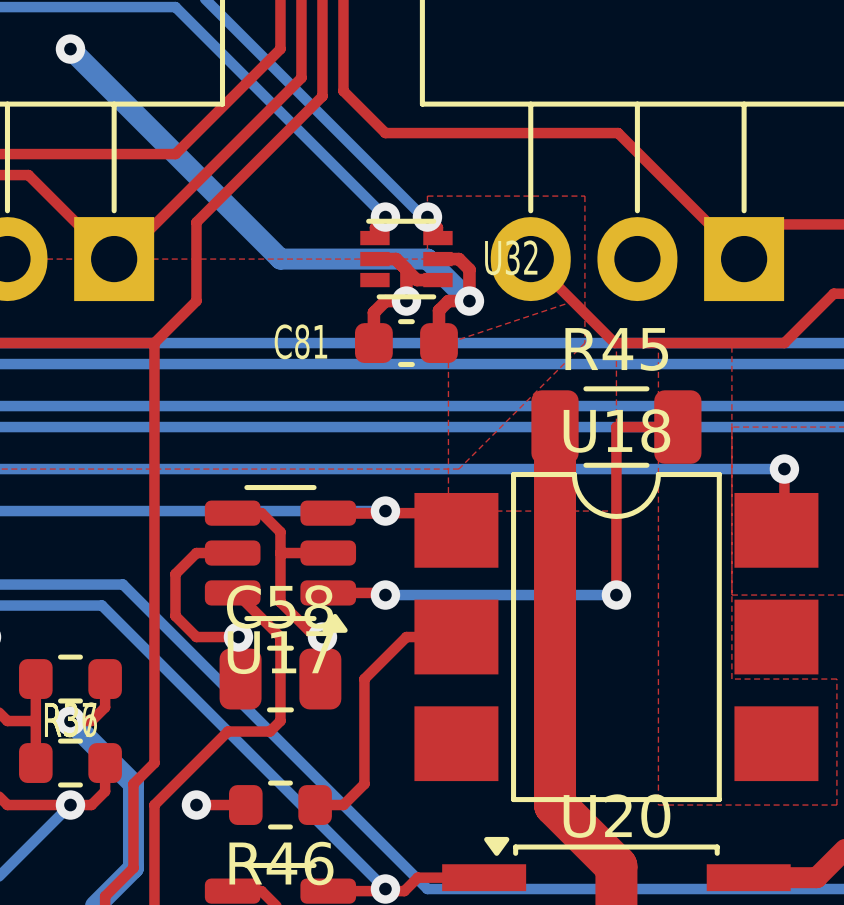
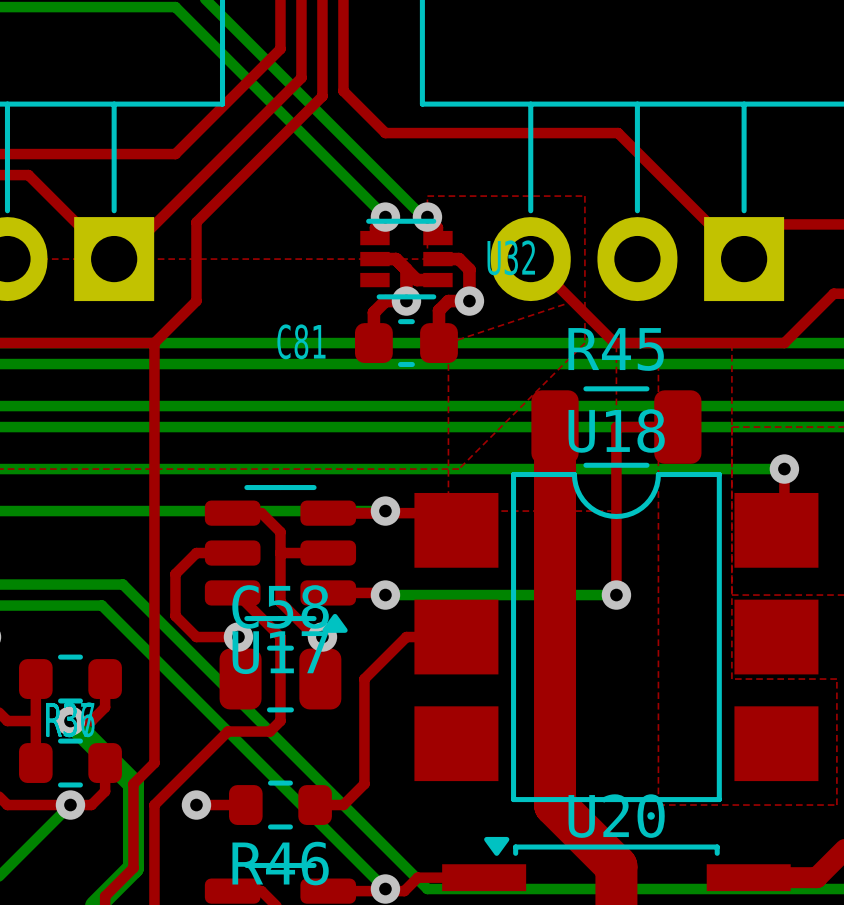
bottom track: (70, 49) (280, 259) (427, 259) (469, 301) -> none
via: (70, 49) -> none

